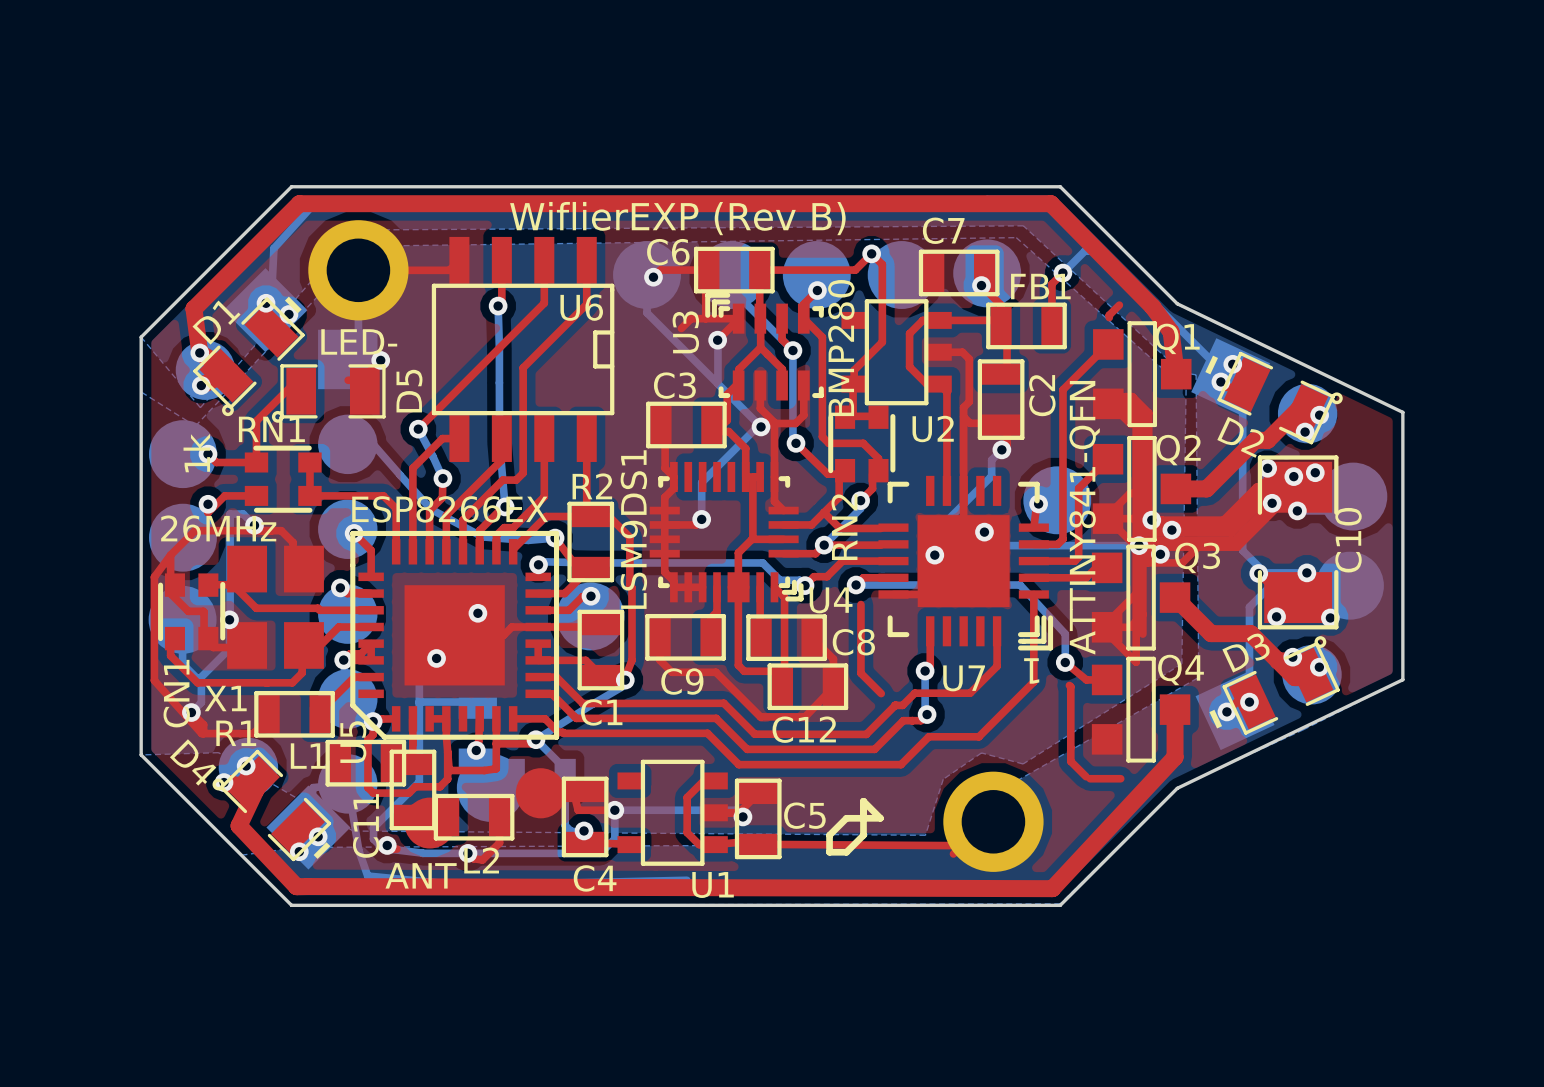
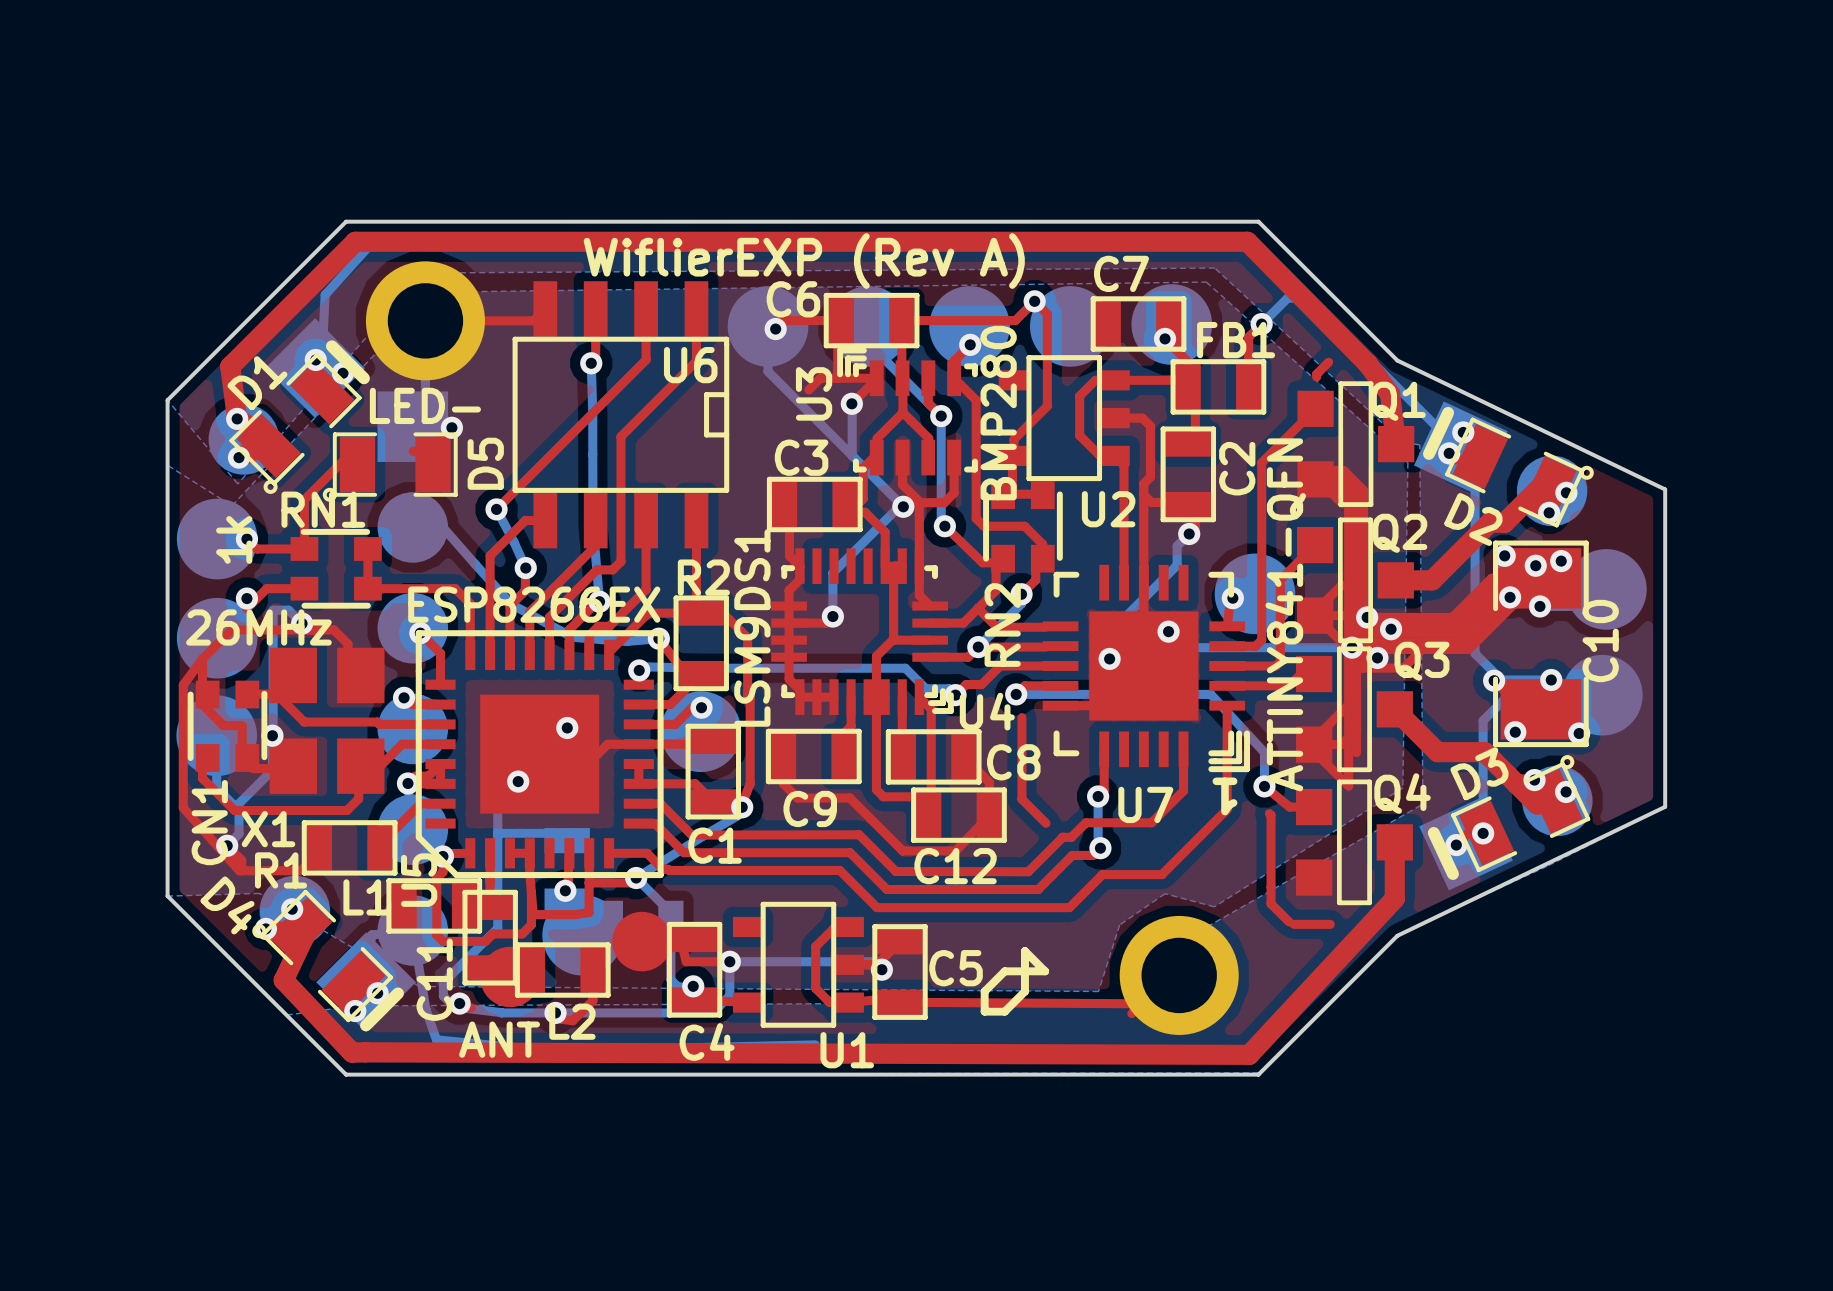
text: WiflierEXP (Rev B) (677, 218) -> WiflierEXP (Rev A) (804, 261)

